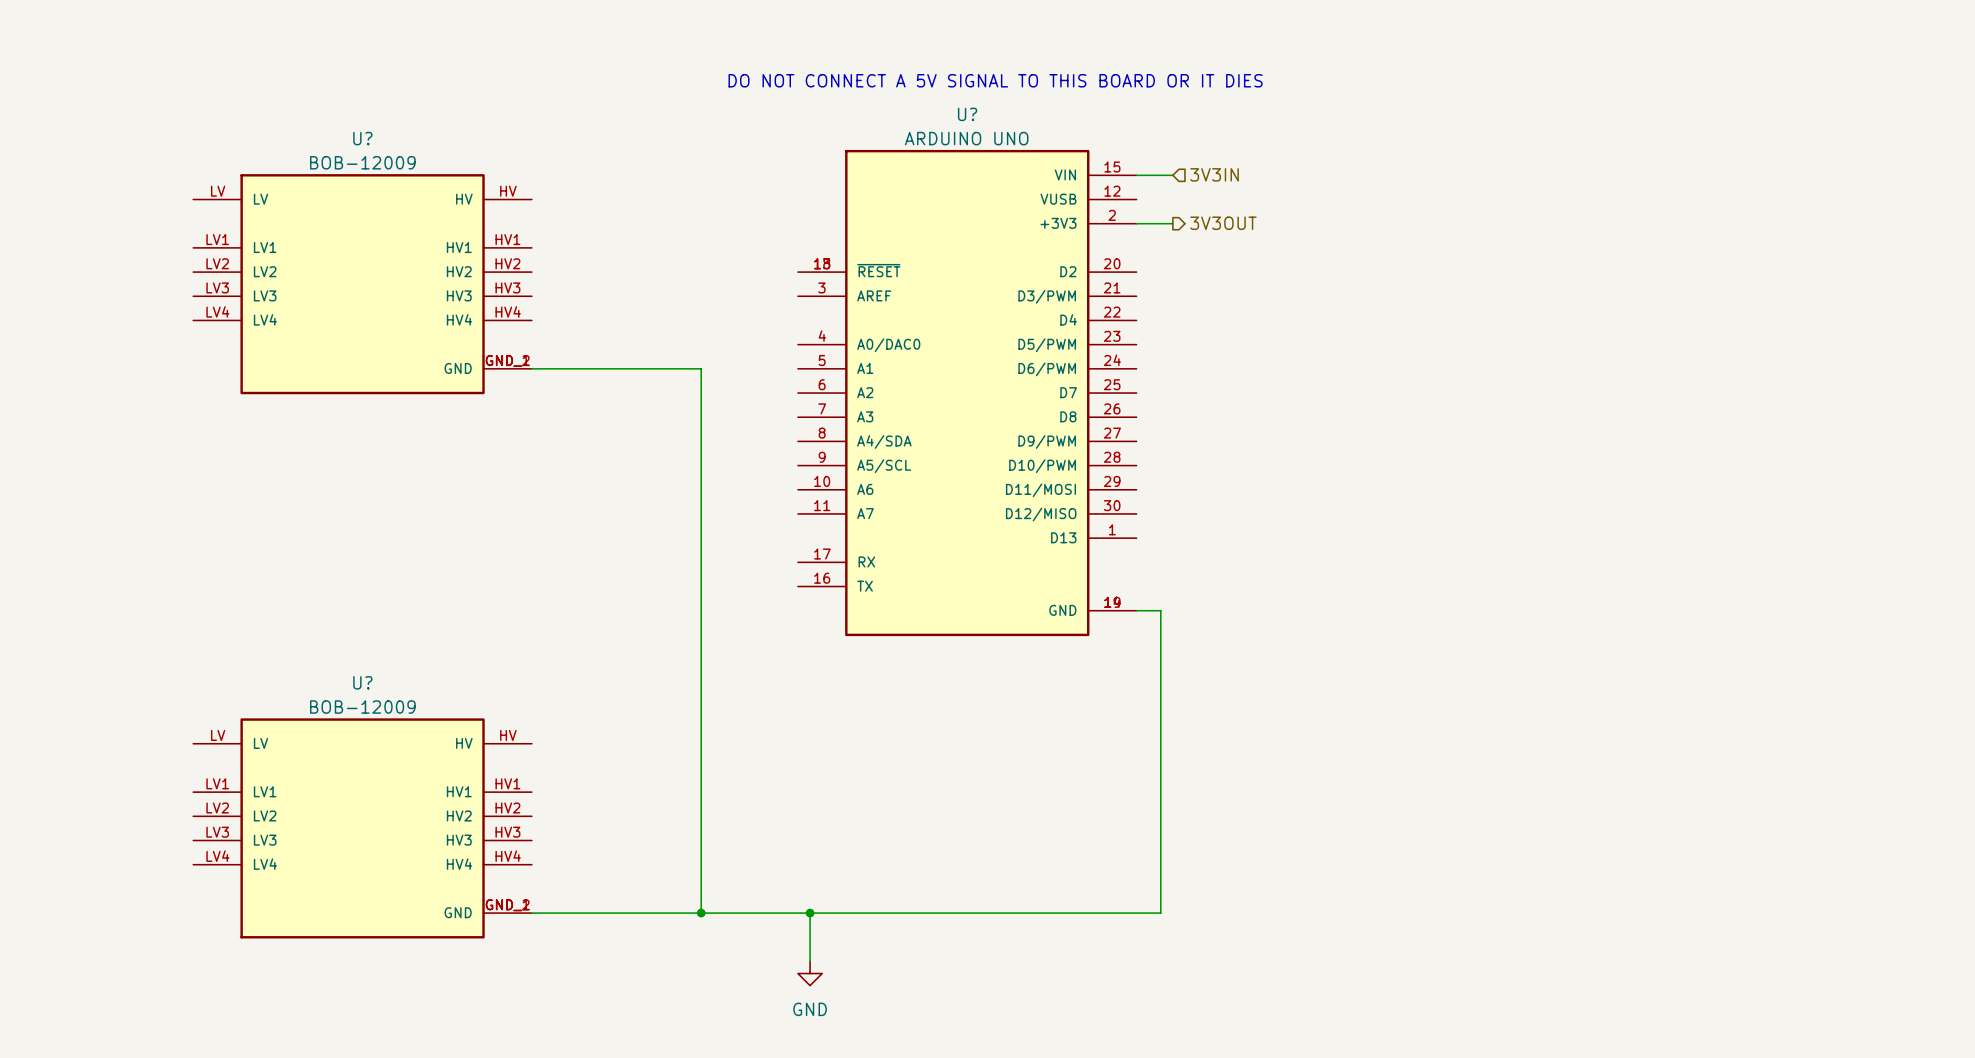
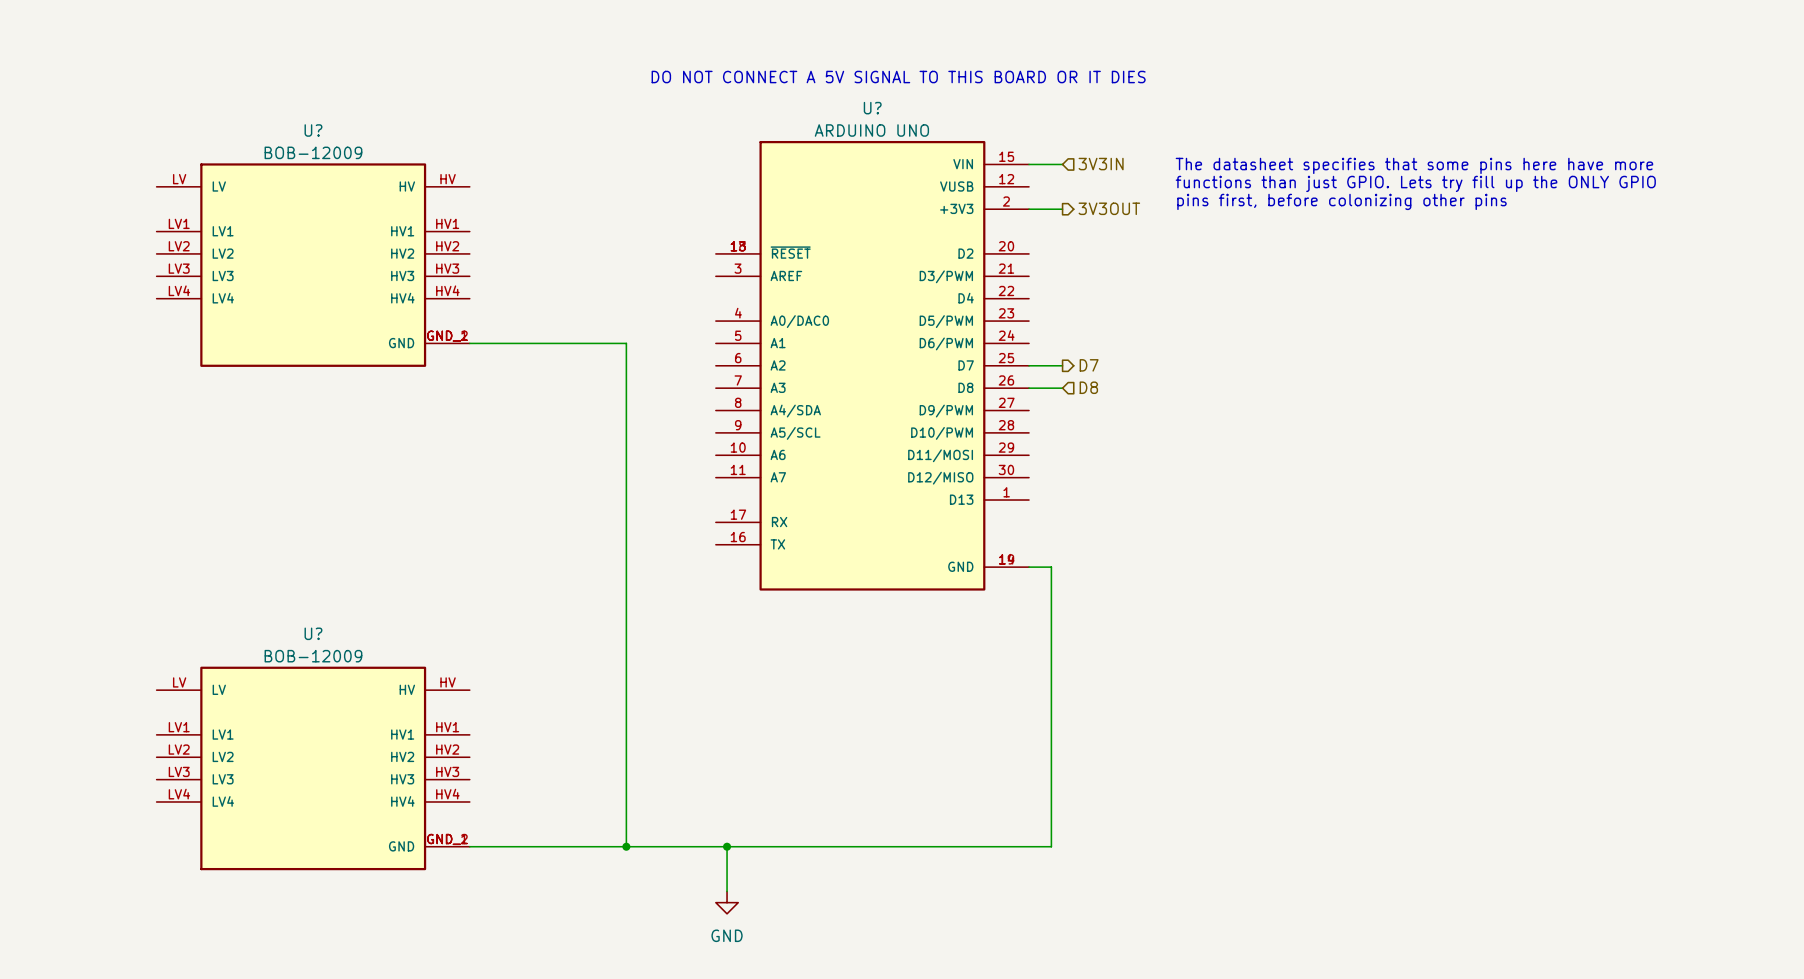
text: none -> The datasheet specifies that some pins here have more (1414, 165)
text: none -> functions than just GPIO. Lets try fill up the ONLY GPIO (1415, 183)
text: none -> pins first, before colonizing other pins (1342, 201)
hierarchical label: none -> D7 (1089, 365)
wire: none -> (1029, 365) (1062, 365)
hierarchical label: none -> D8 (1088, 387)
wire: none -> (1029, 388) (1062, 388)

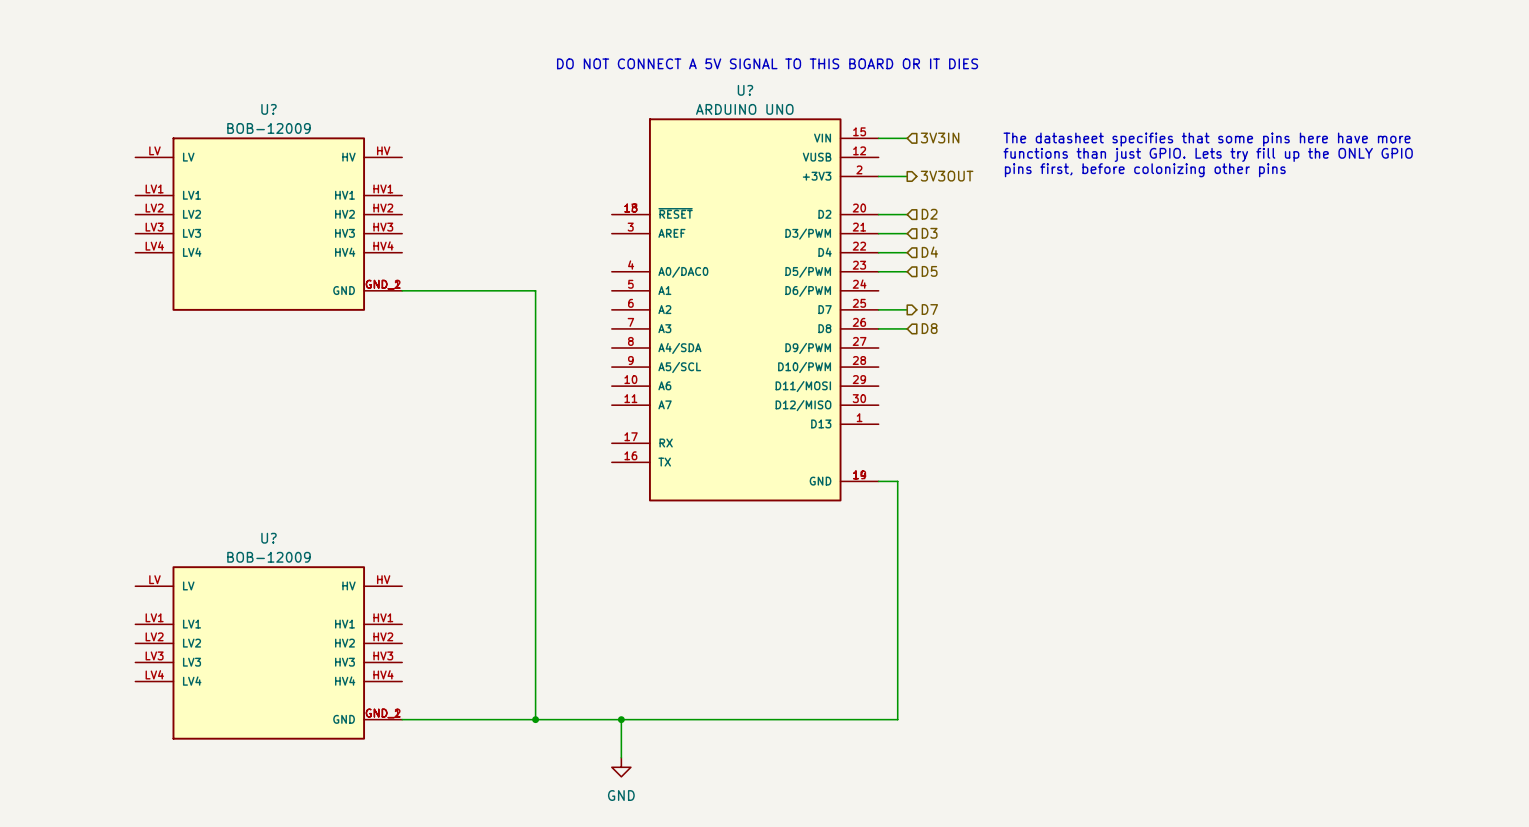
wire: none -> (878, 214) (907, 214)
hierarchical label: none -> D2 (929, 214)
hierarchical label: none -> D3 (929, 233)
wire: none -> (878, 233) (907, 233)
wire: none -> (878, 252) (907, 252)
hierarchical label: none -> D4 (929, 252)
hierarchical label: none -> D5 (929, 271)
wire: none -> (878, 271) (907, 271)

